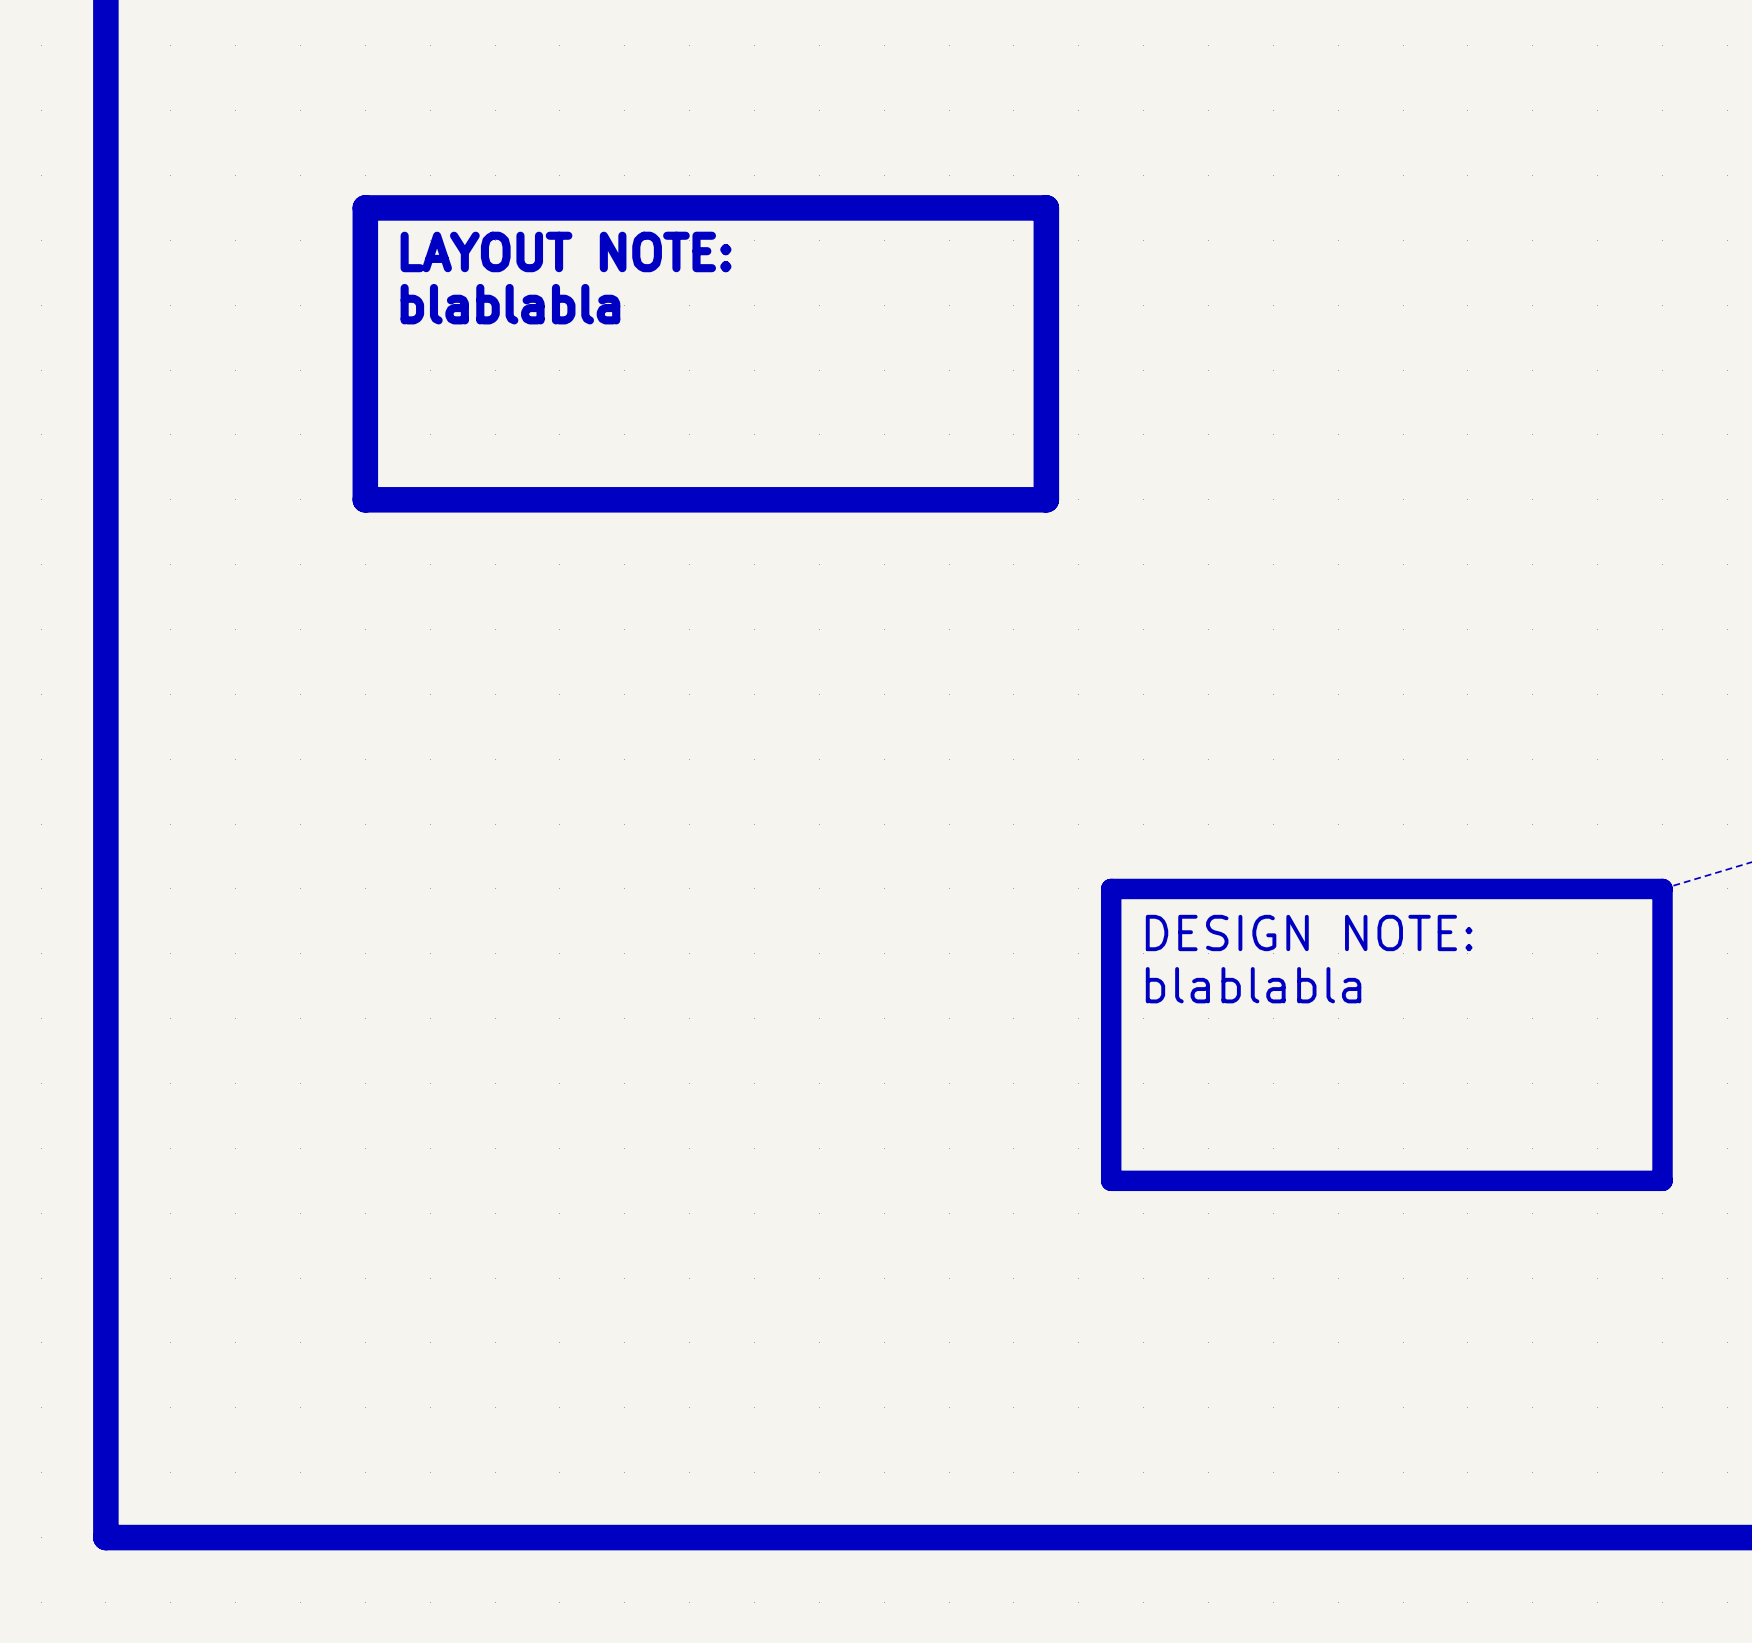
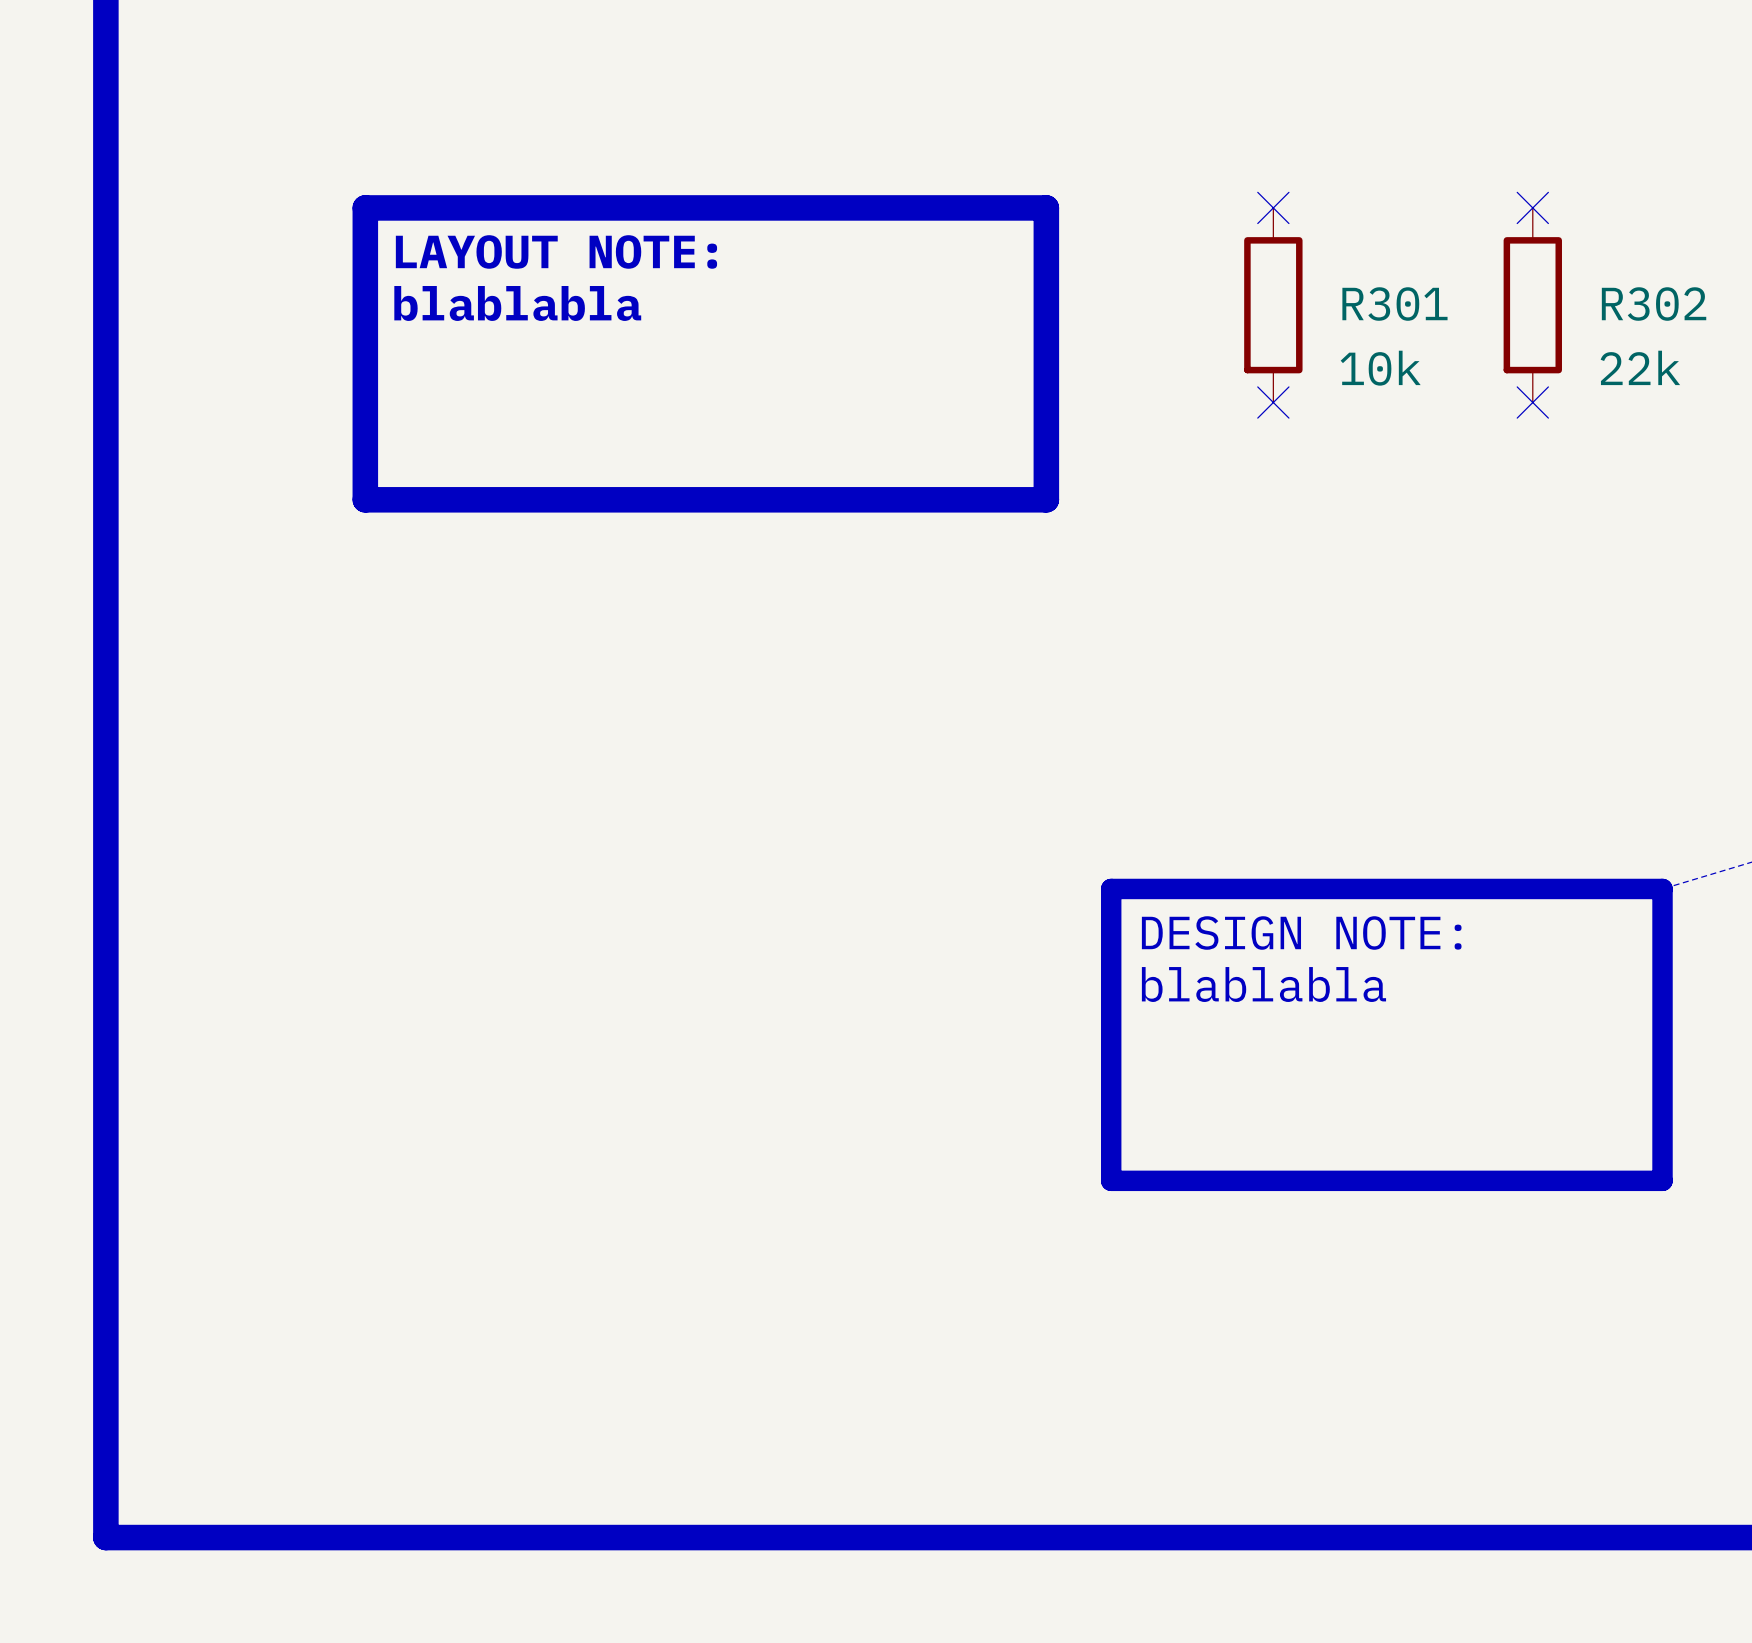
no-connect mark: none -> (1273, 207)
no-connect mark: none -> (1532, 207)
R301: none -> 10k (1273, 305)
R302: none -> 22k (1532, 305)
no-connect mark: none -> (1273, 402)
no-connect mark: none -> (1532, 402)

